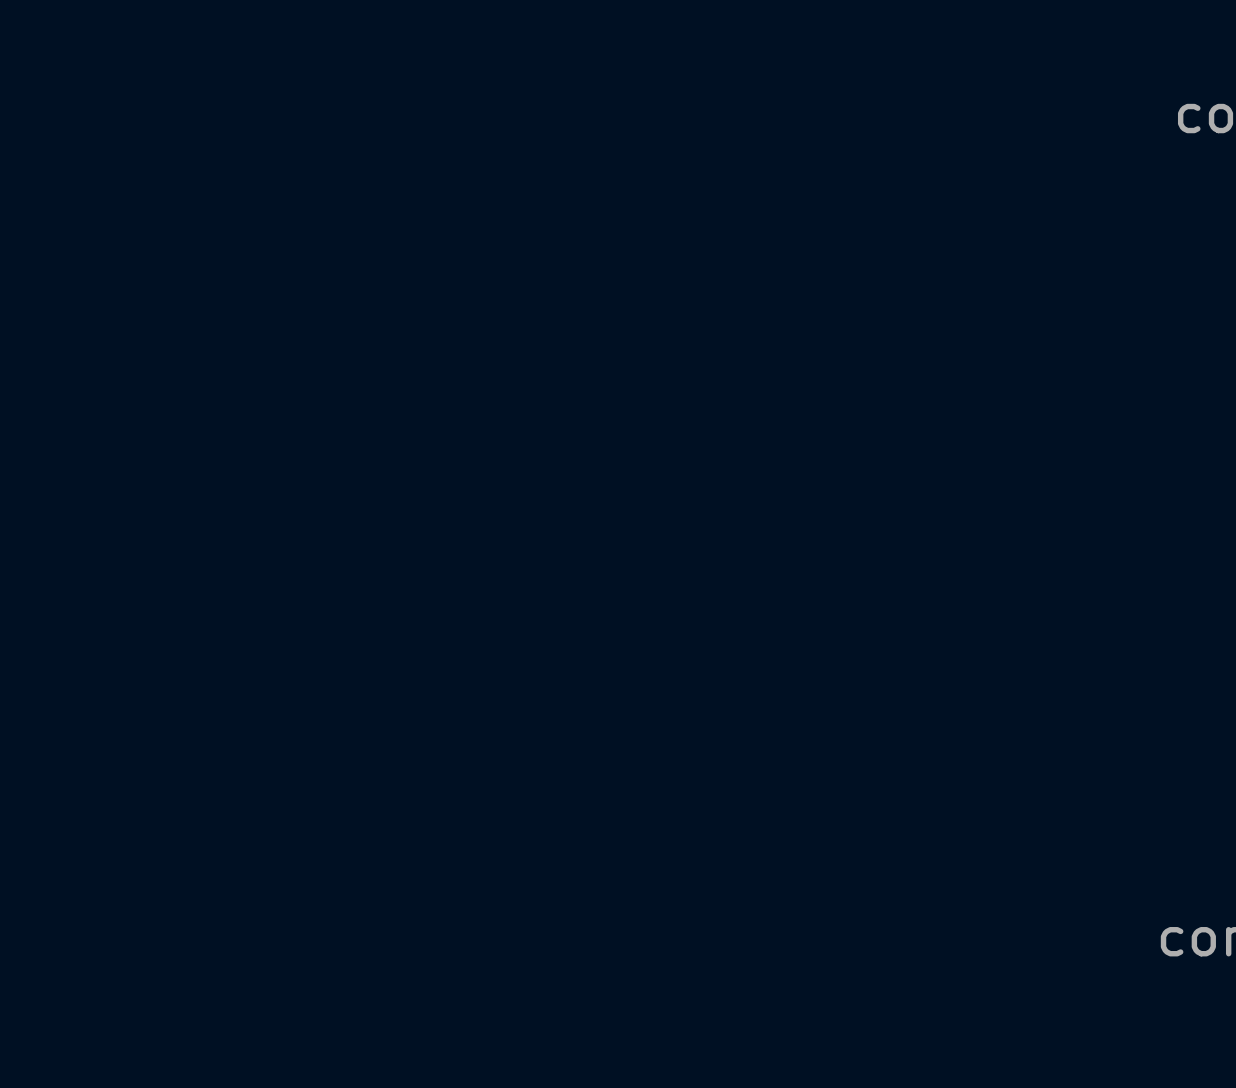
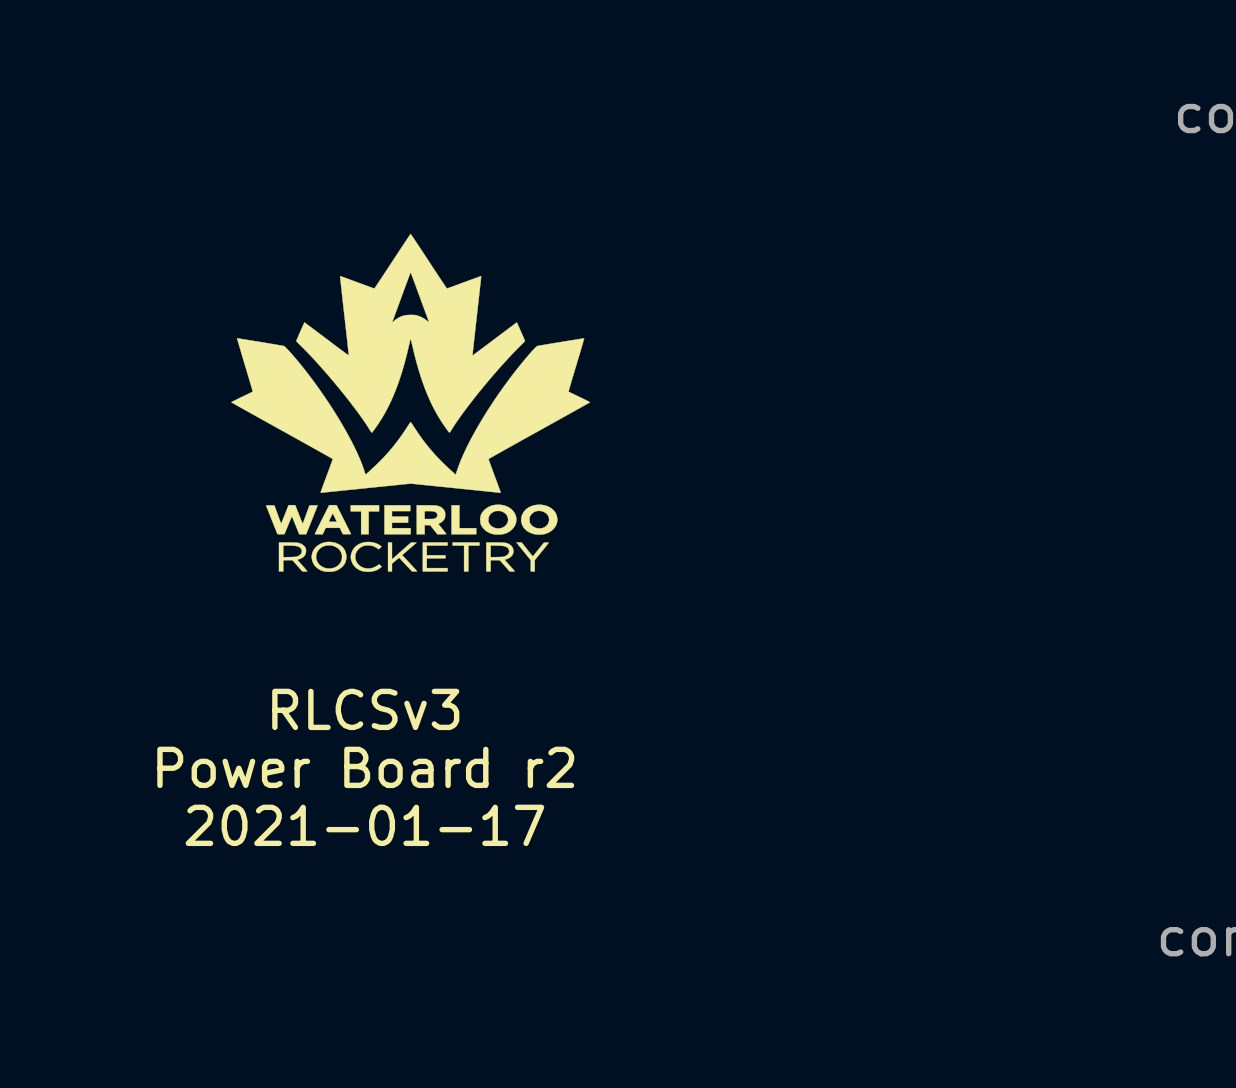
drawing: none -> [231, 233, 591, 572]
text: none -> RLCSv3 (365, 709)
text: none -> Power Board r2 (365, 767)
text: none -> 2021-01-17 (364, 825)

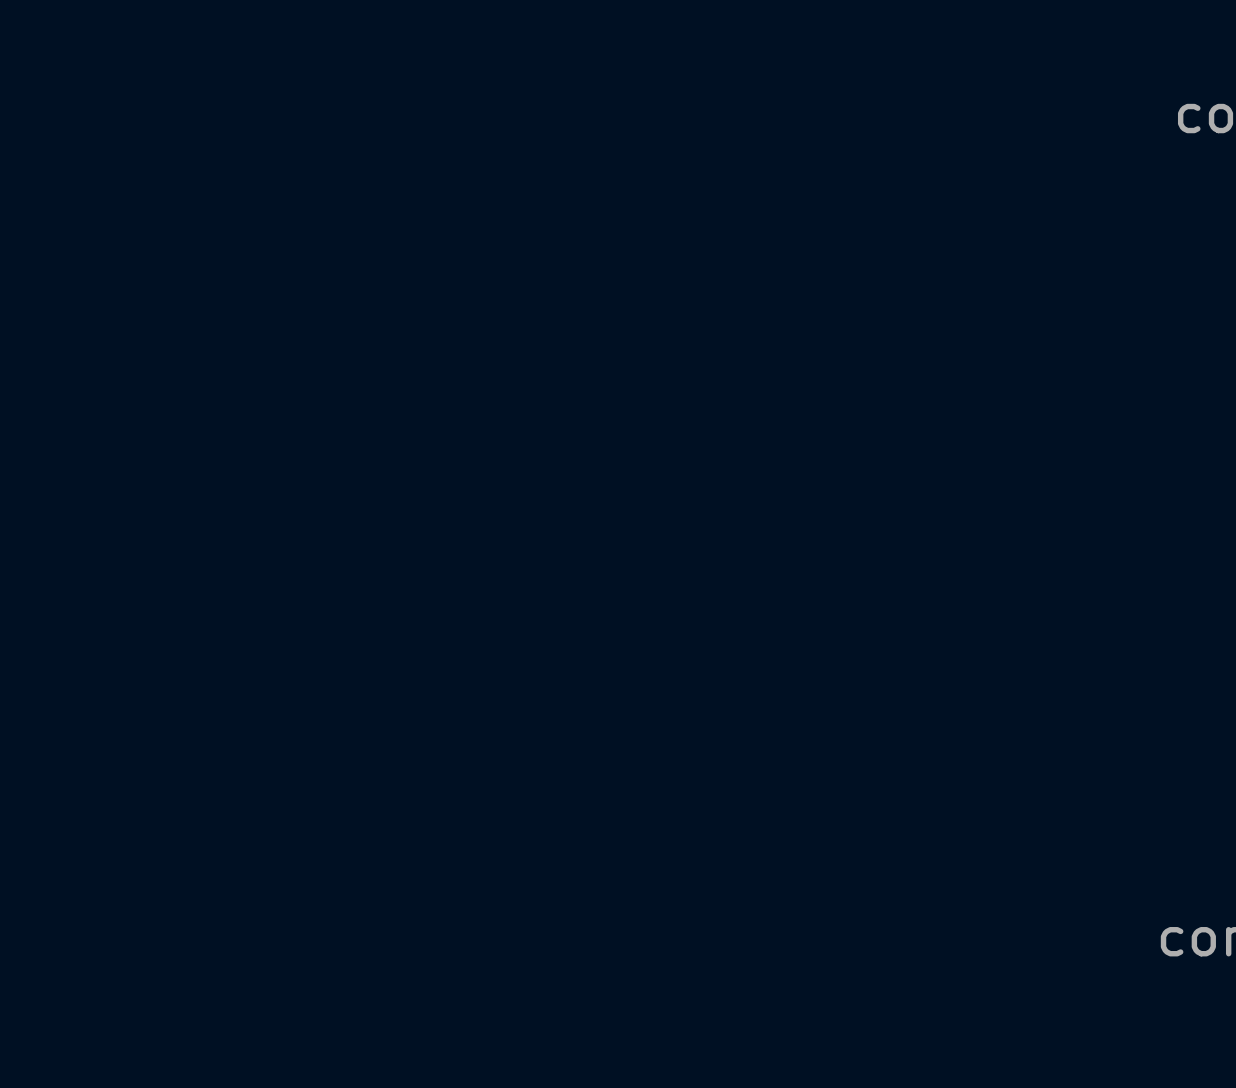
drawing: [231, 233, 591, 572] -> none
text: RLCSv3 (365, 709) -> none
text: Power Board r2 (365, 767) -> none
text: 2021-01-17 (364, 825) -> none

